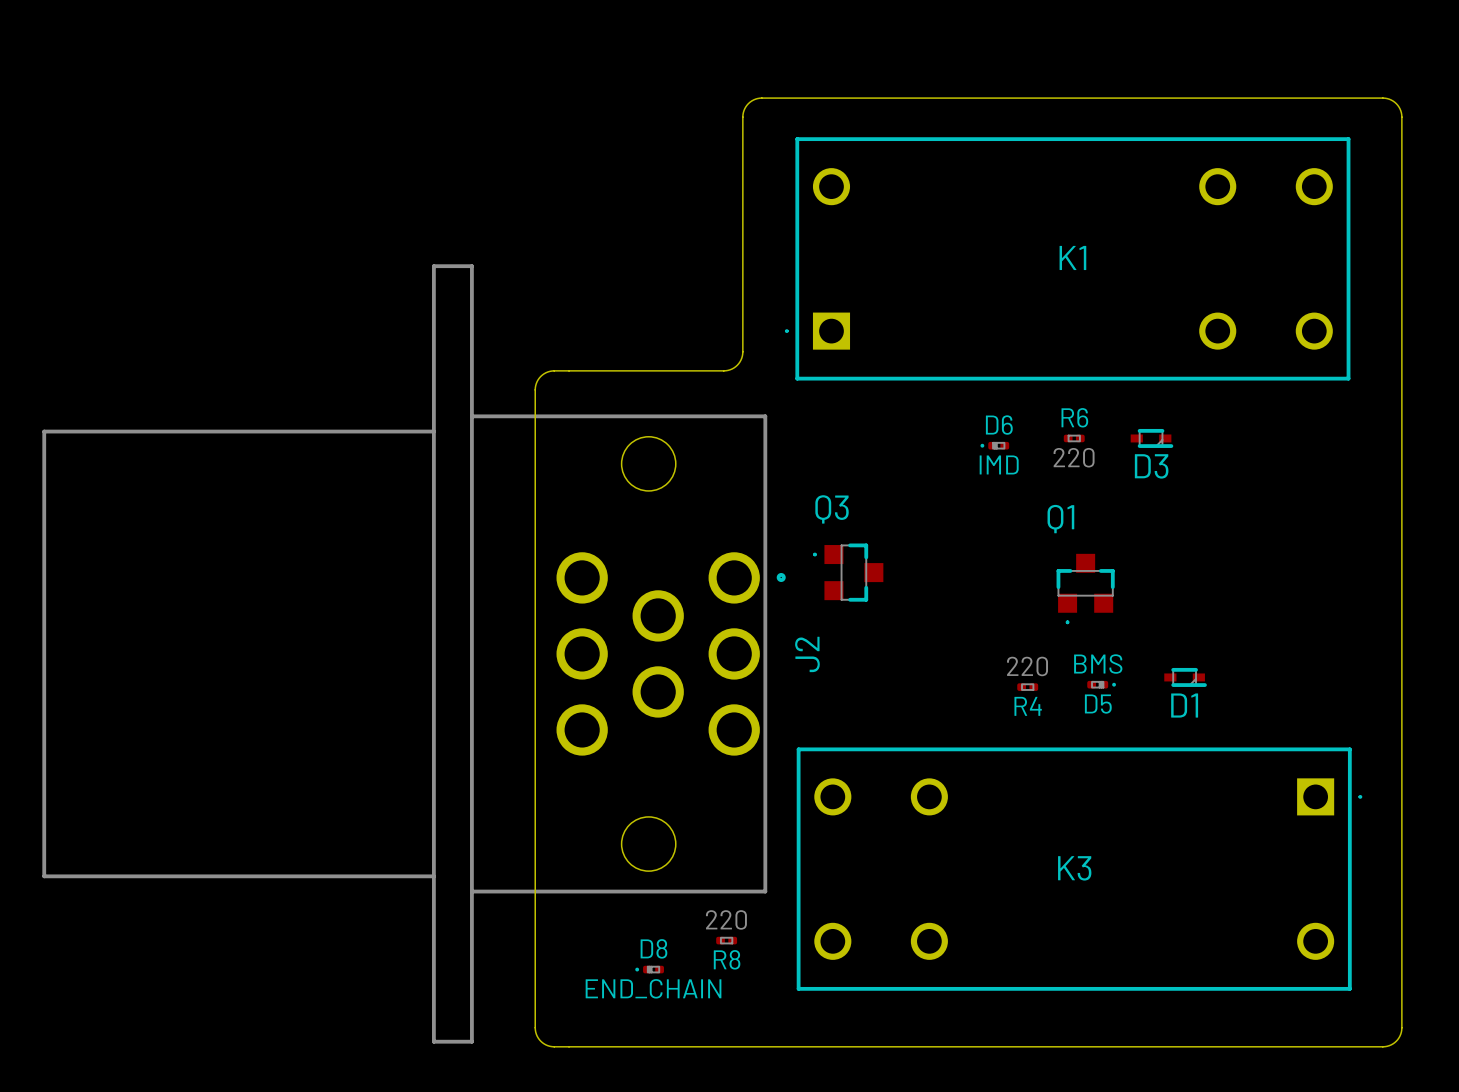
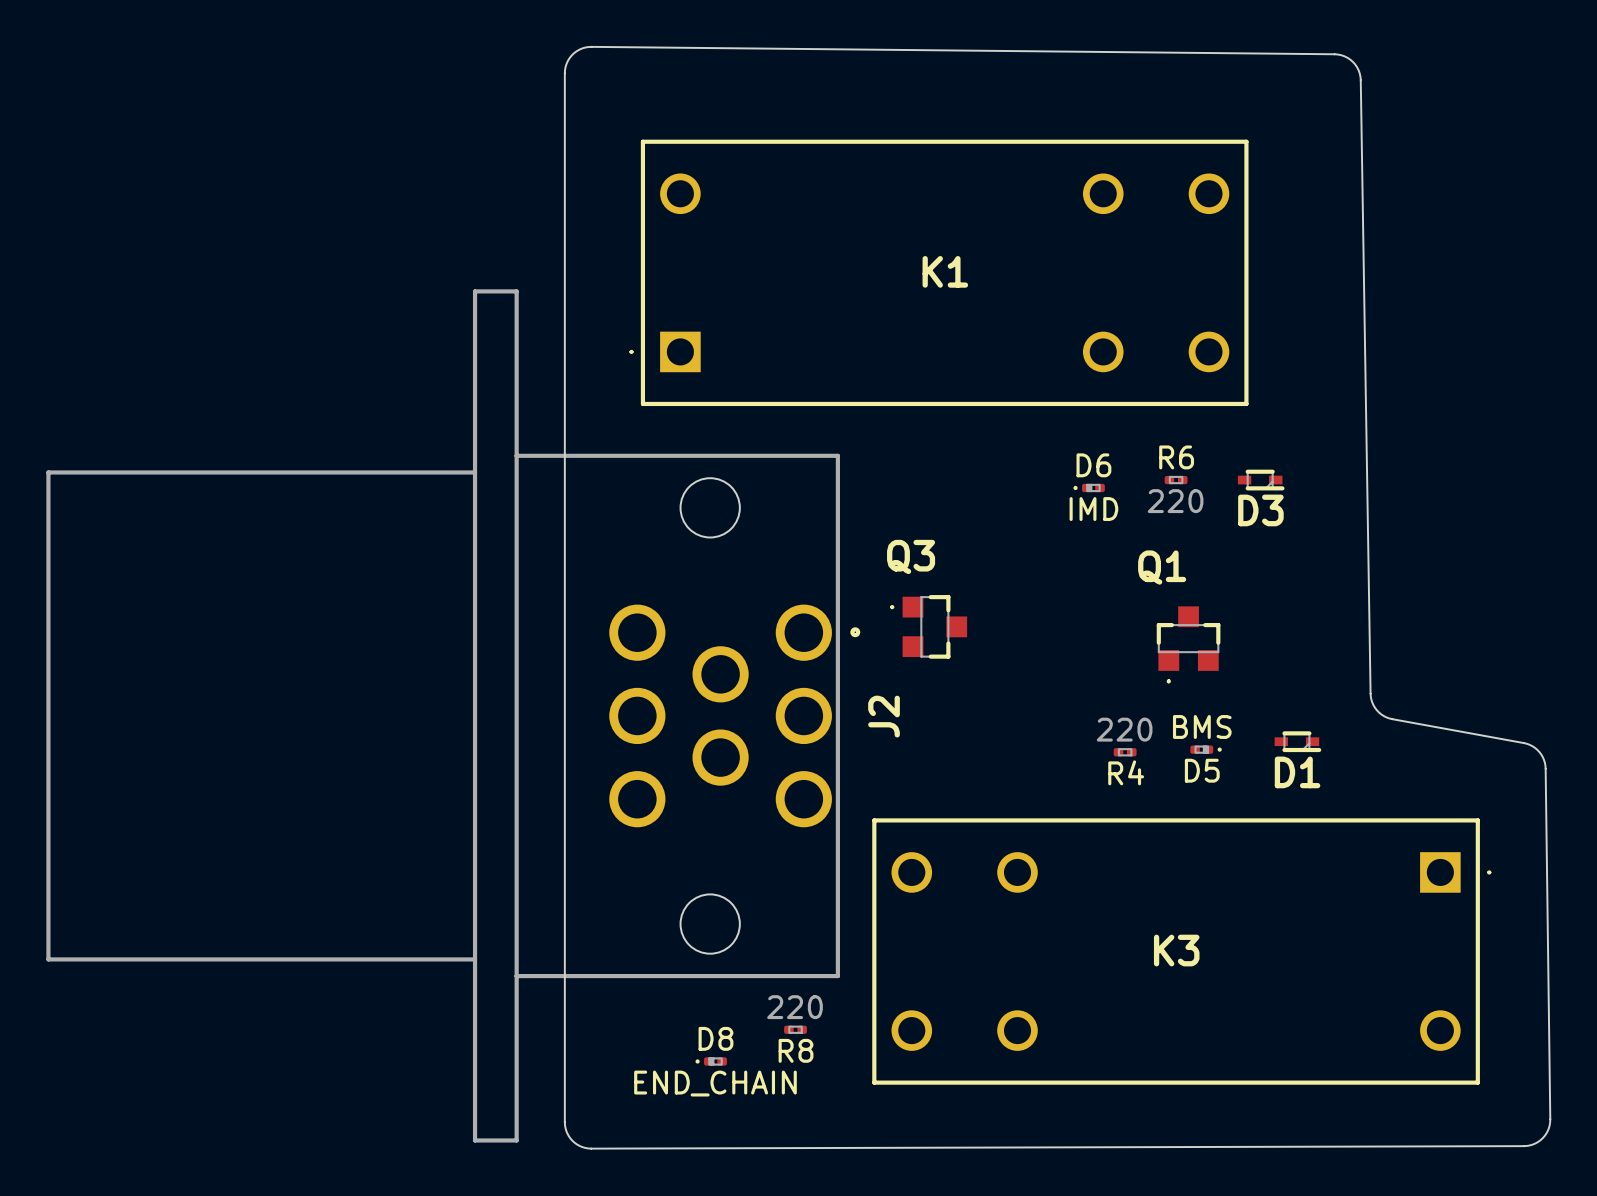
board edge: (761, 98) (1382, 98) (1391, 99) (1398, 106) (1401, 117) (1401, 1027) (1399, 1036) (1392, 1043) (1382, 1046) (554, 1046) (545, 1044) (538, 1037) (535, 1027) (535, 385) (540, 376) (552, 370) (723, 370) (732, 368) (738, 363) (742, 351) (742, 114) (748, 103) (761, 98) -> (591, 46) (582, 48) (572, 54) (567, 61) (564, 73) (564, 1122) (570, 1138) (579, 1146) (591, 1148) (1523, 1146) (1532, 1144) (1540, 1140) (1547, 1130) (1550, 1119) (1545, 768) (1543, 759) (1537, 749) (1526, 743) (1389, 718) (1376, 710) (1370, 696) (1360, 80) (1355, 64) (1344, 56) (1334, 54) (591, 46)
K1 position: (1067, 258) -> (938, 272)

